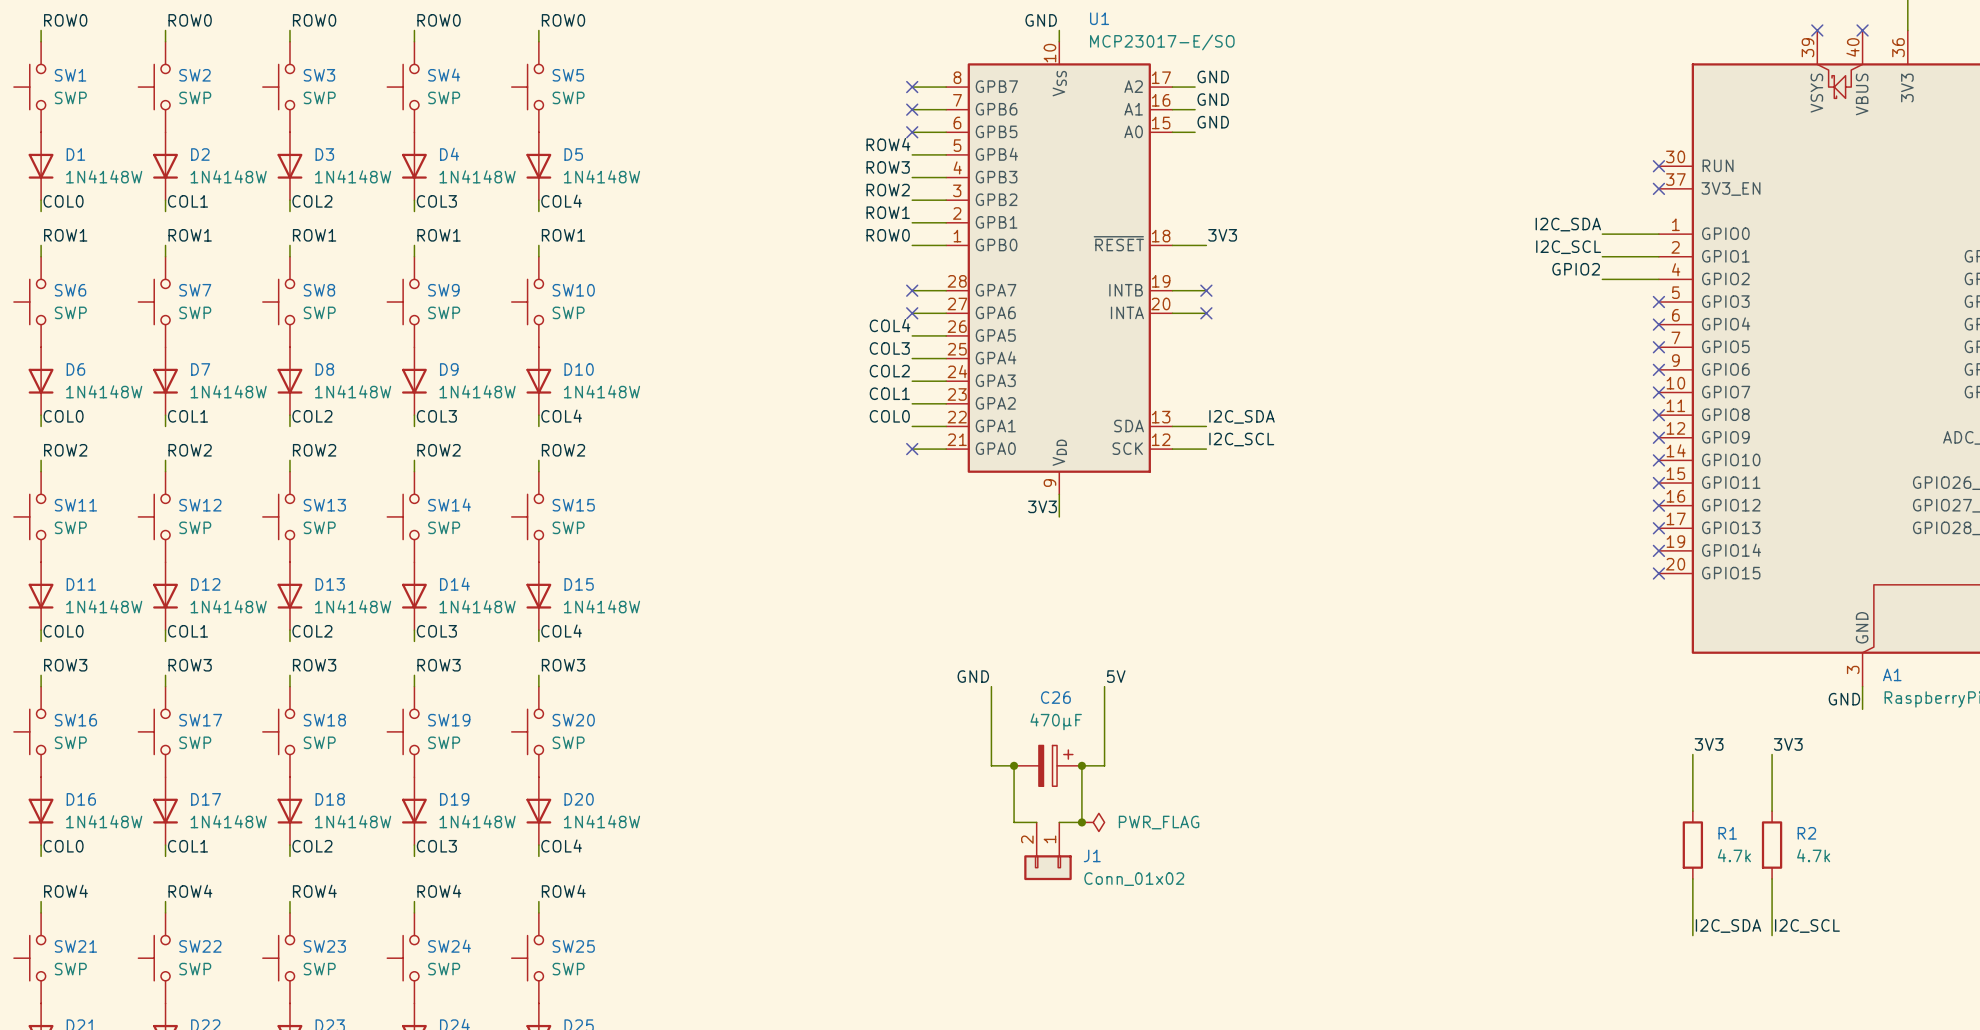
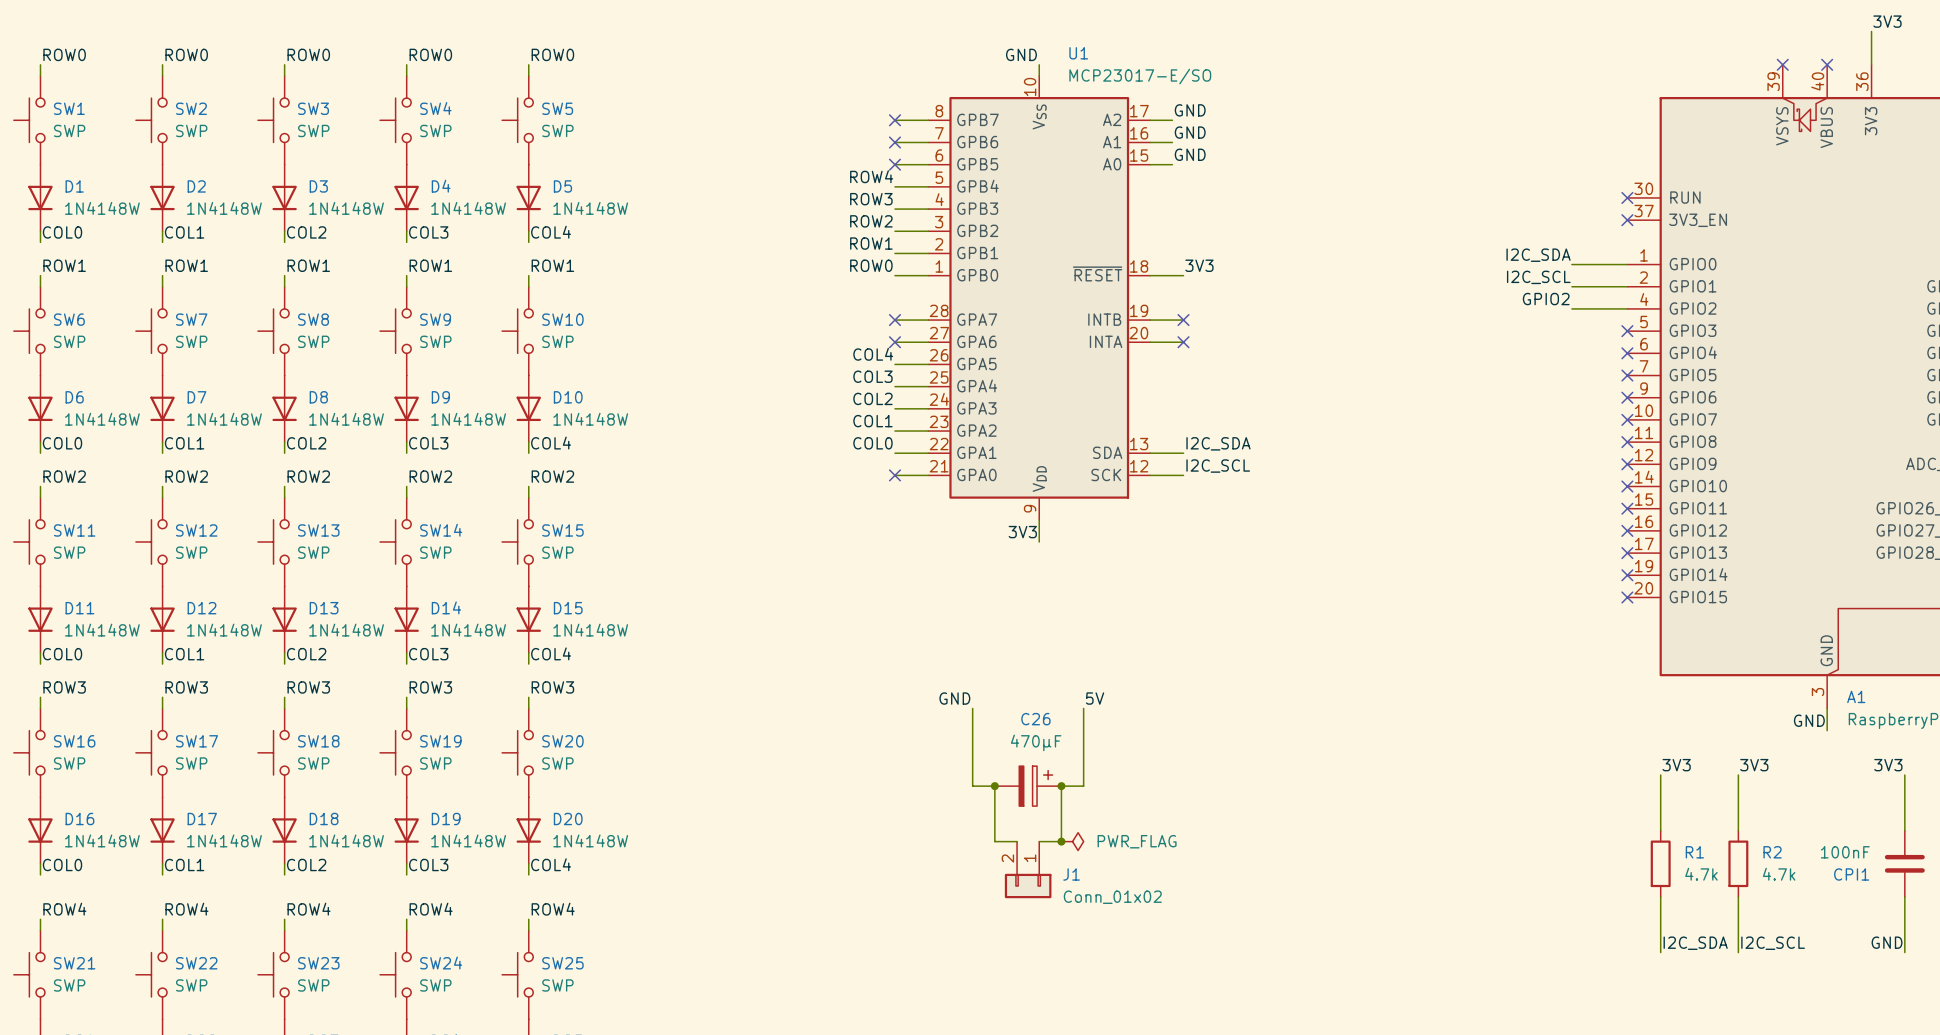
label: none -> 3V3 (1888, 765)
wire: none -> (1904, 775) (1904, 830)
CPI1: none -> 100nF (1904, 863)
wire: none -> (1904, 897) (1904, 952)
label: none -> GND (1887, 942)

